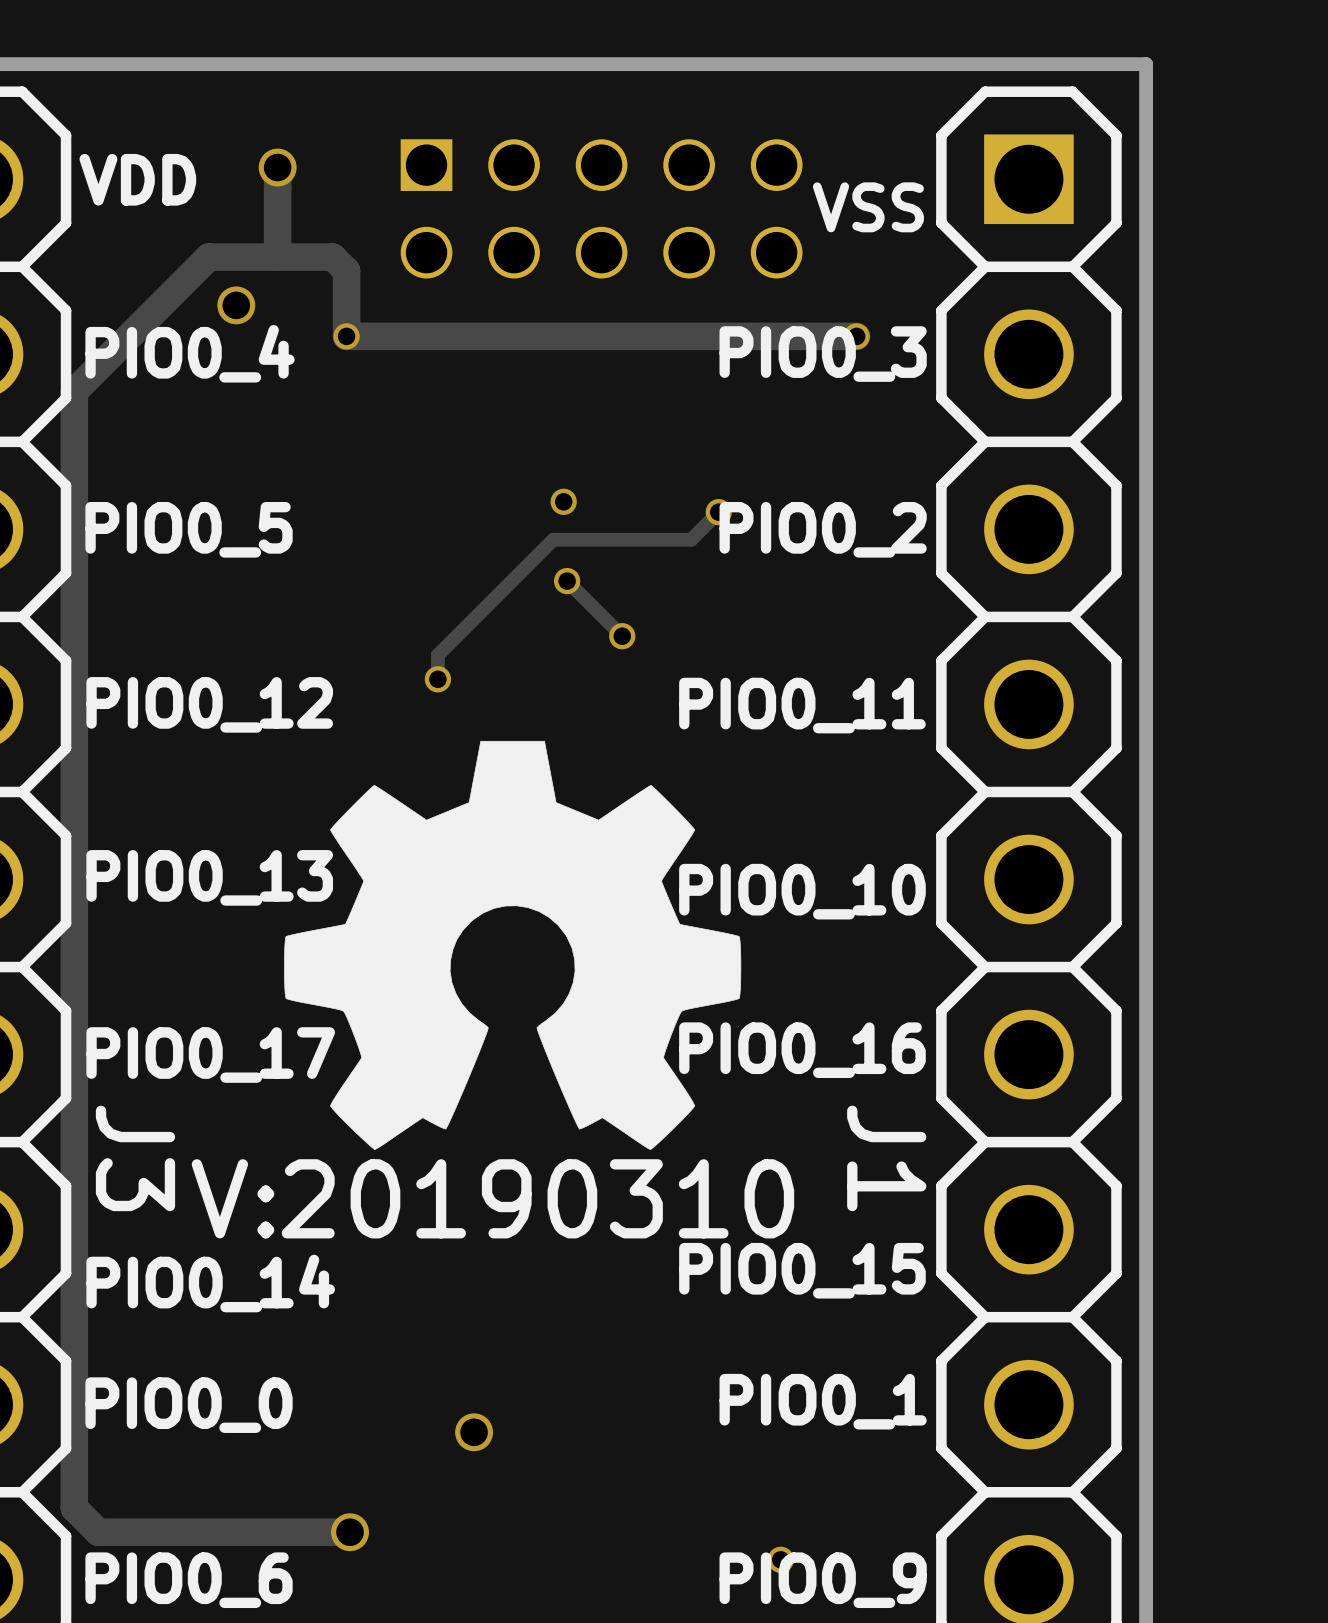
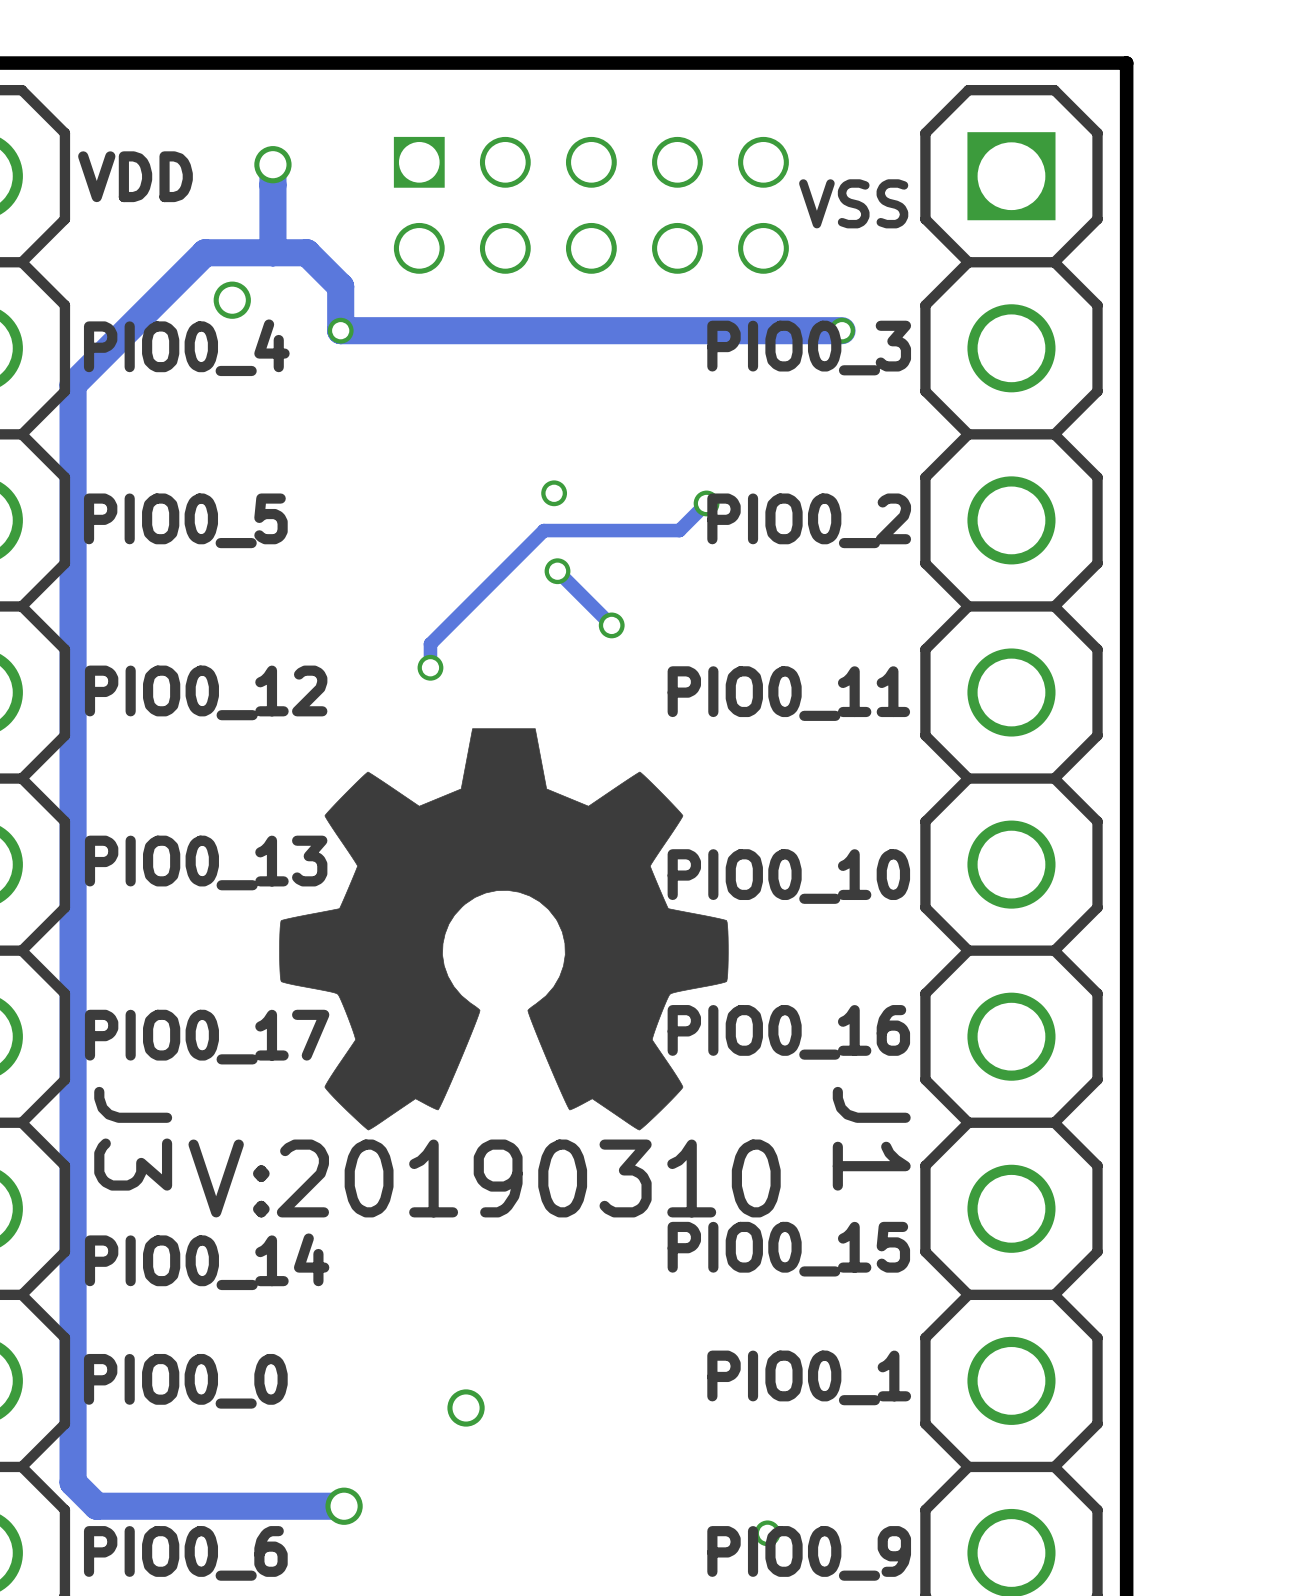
track: (312, 257) (332, 257) (346, 270) (346, 291) -> (306, 252) (340, 286)

